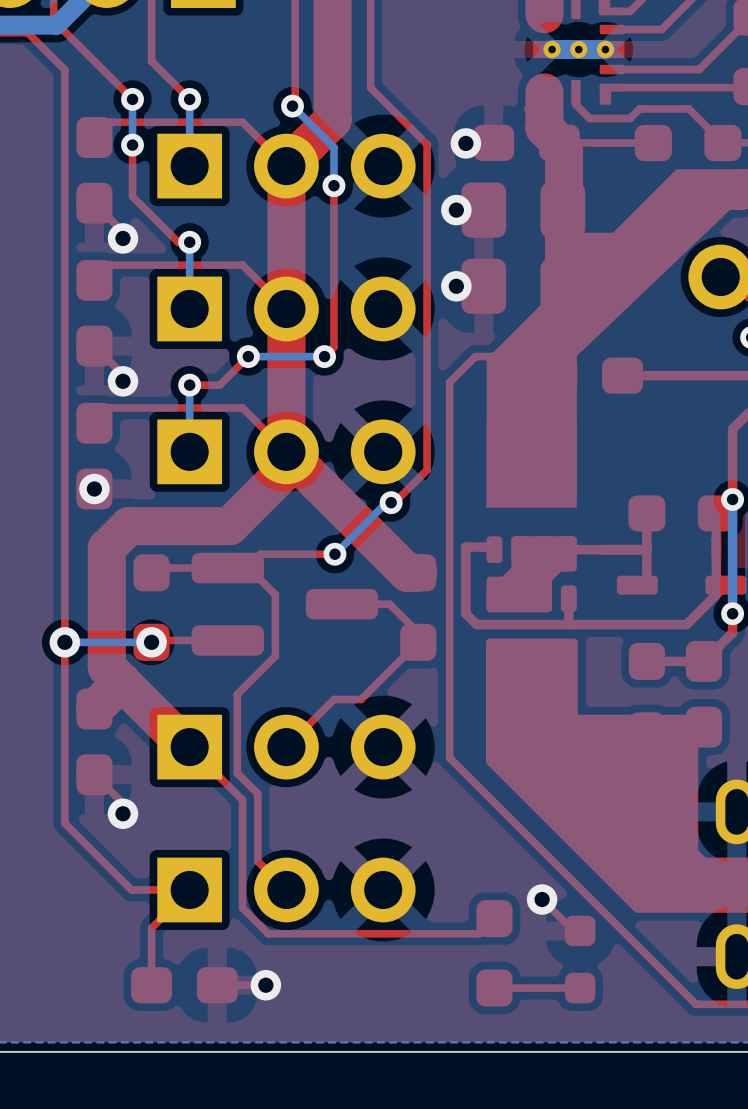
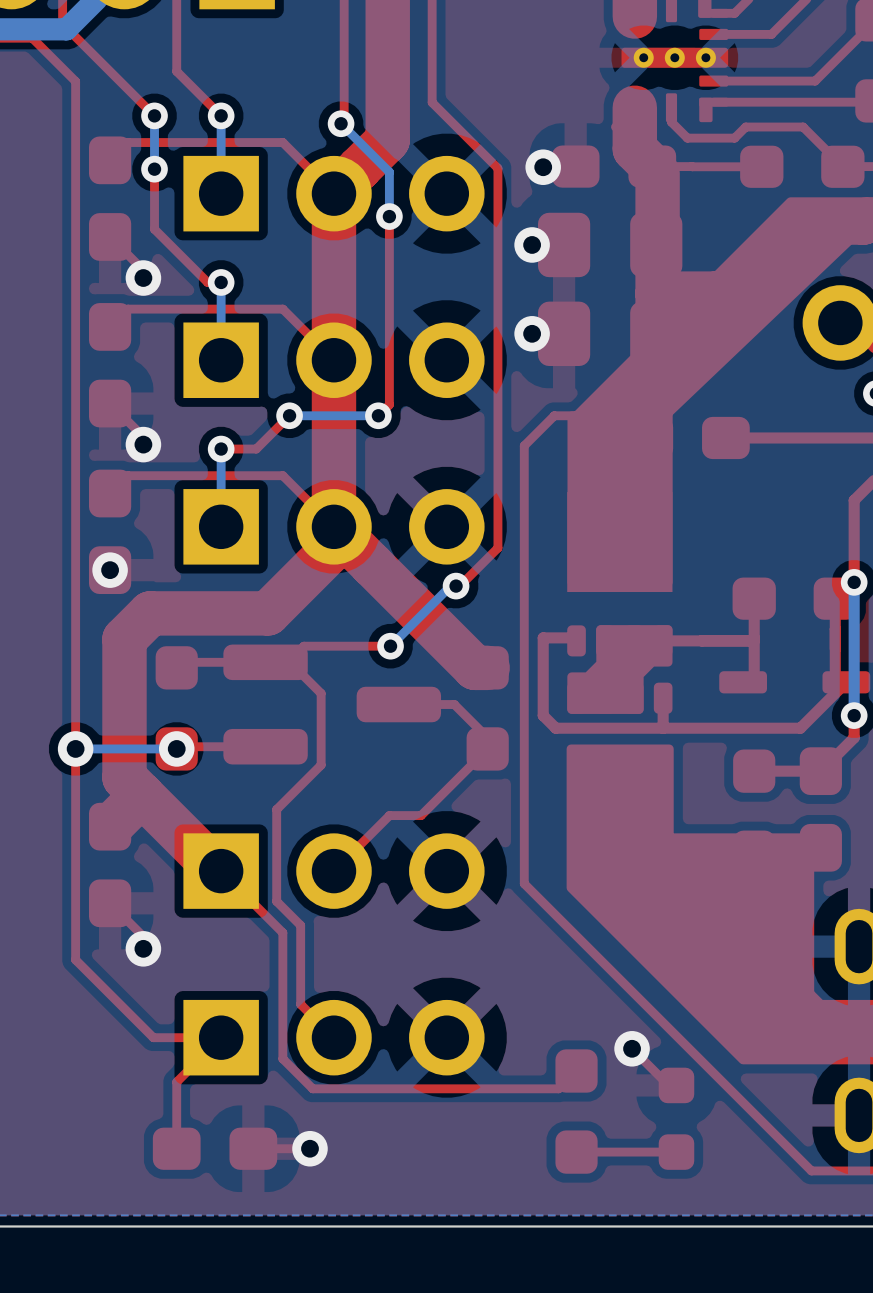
bottom track: (605, 49) (552, 49) -> none

